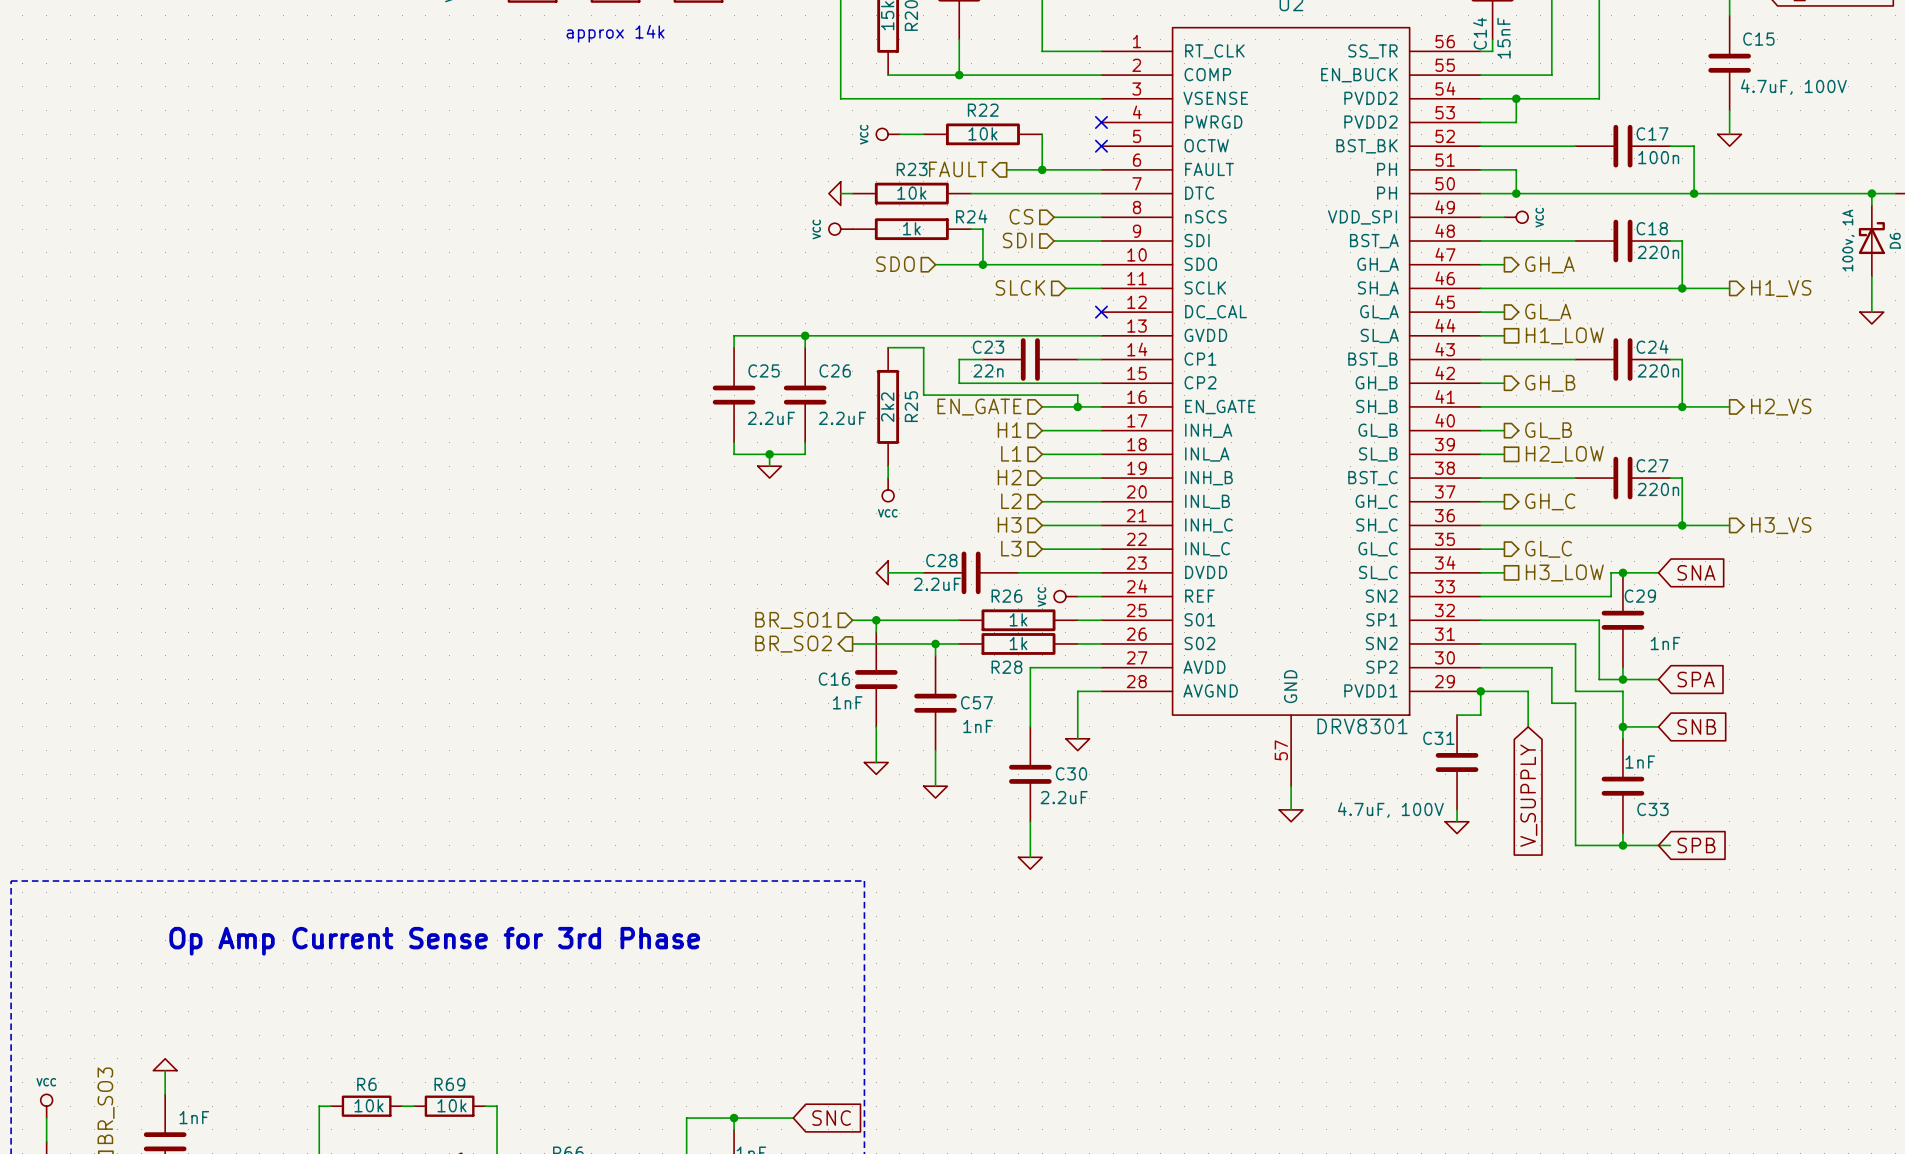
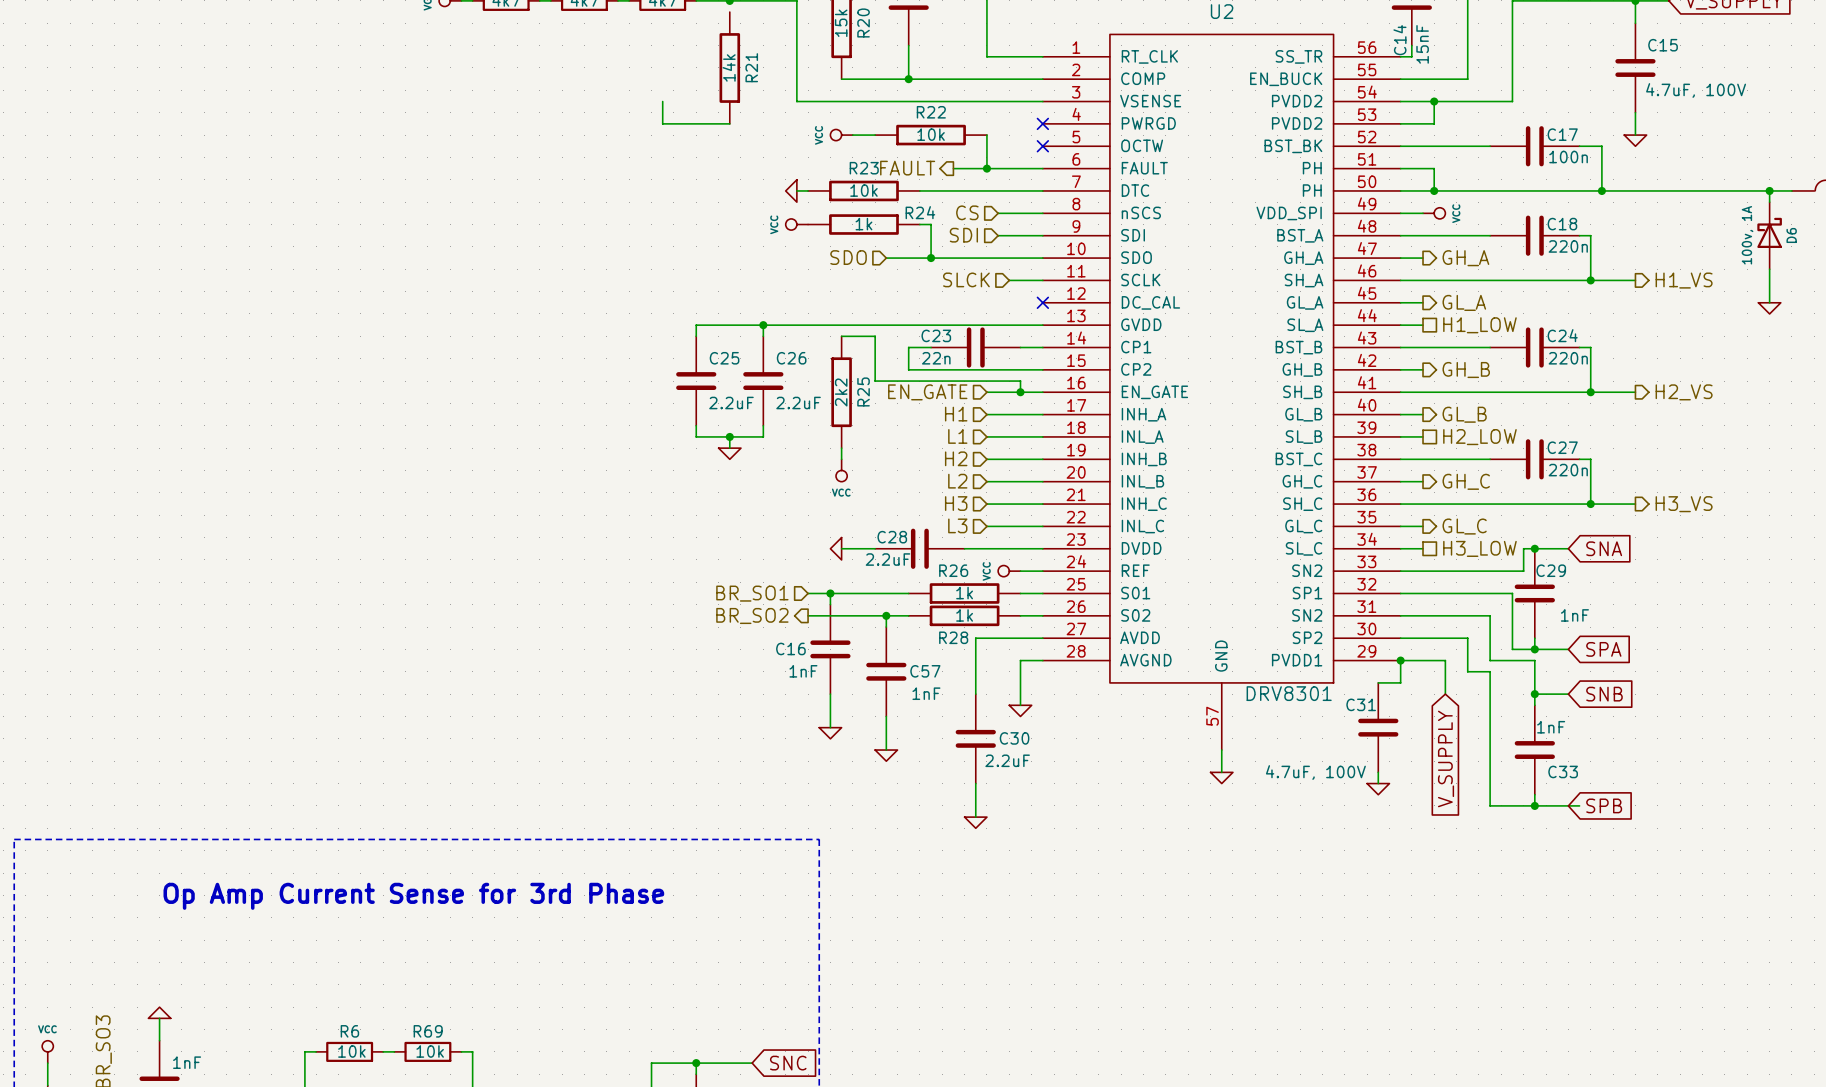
text: approx 14k (615, 33) -> none
R21: none -> 14k (729, 67)
wire: none -> (662, 101) (662, 123) (729, 123)

